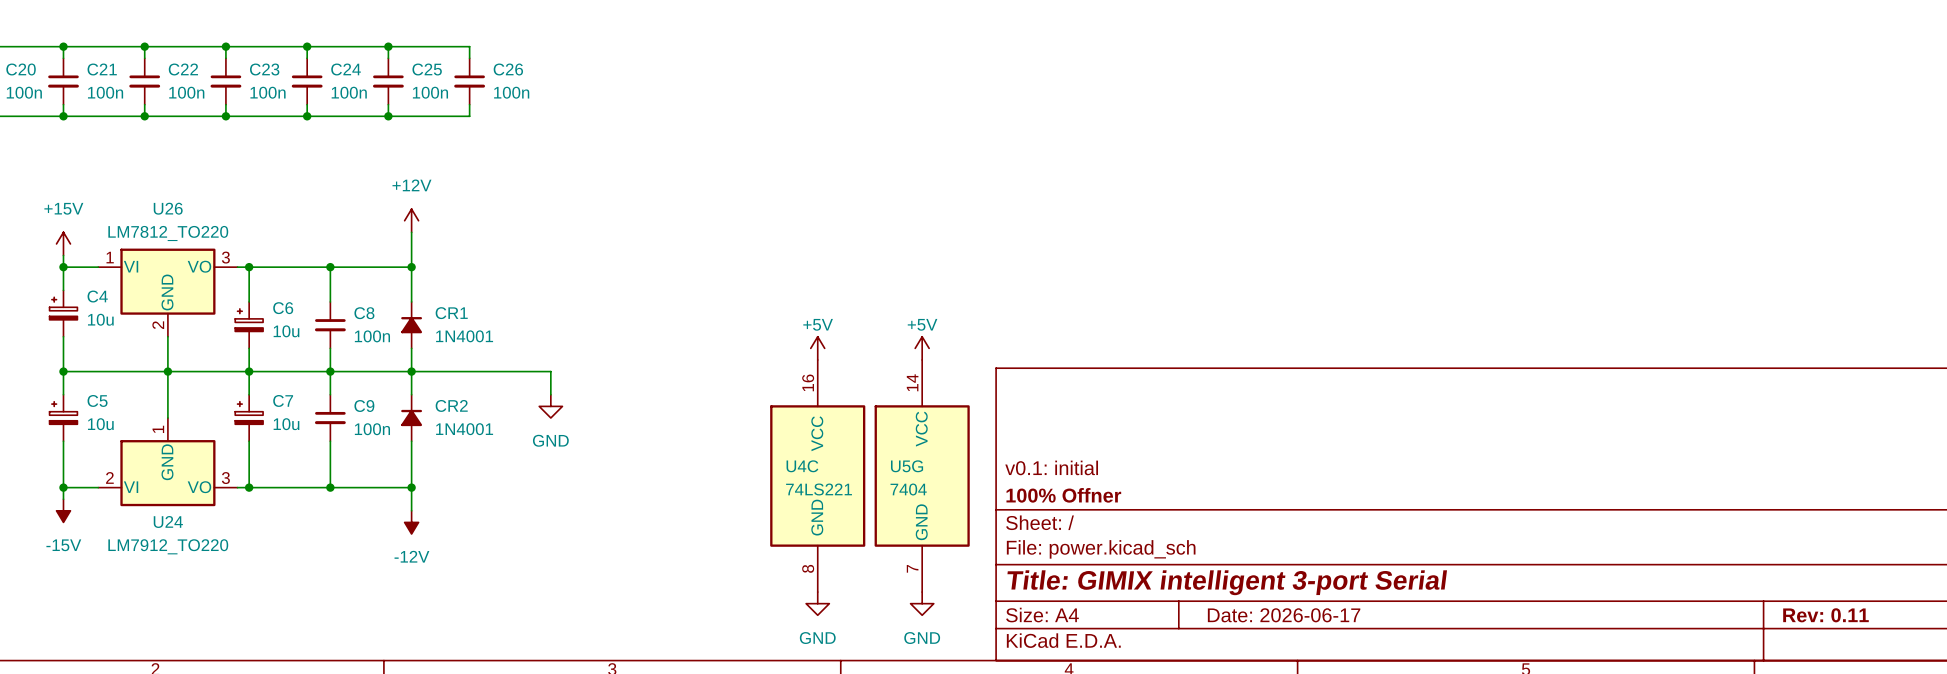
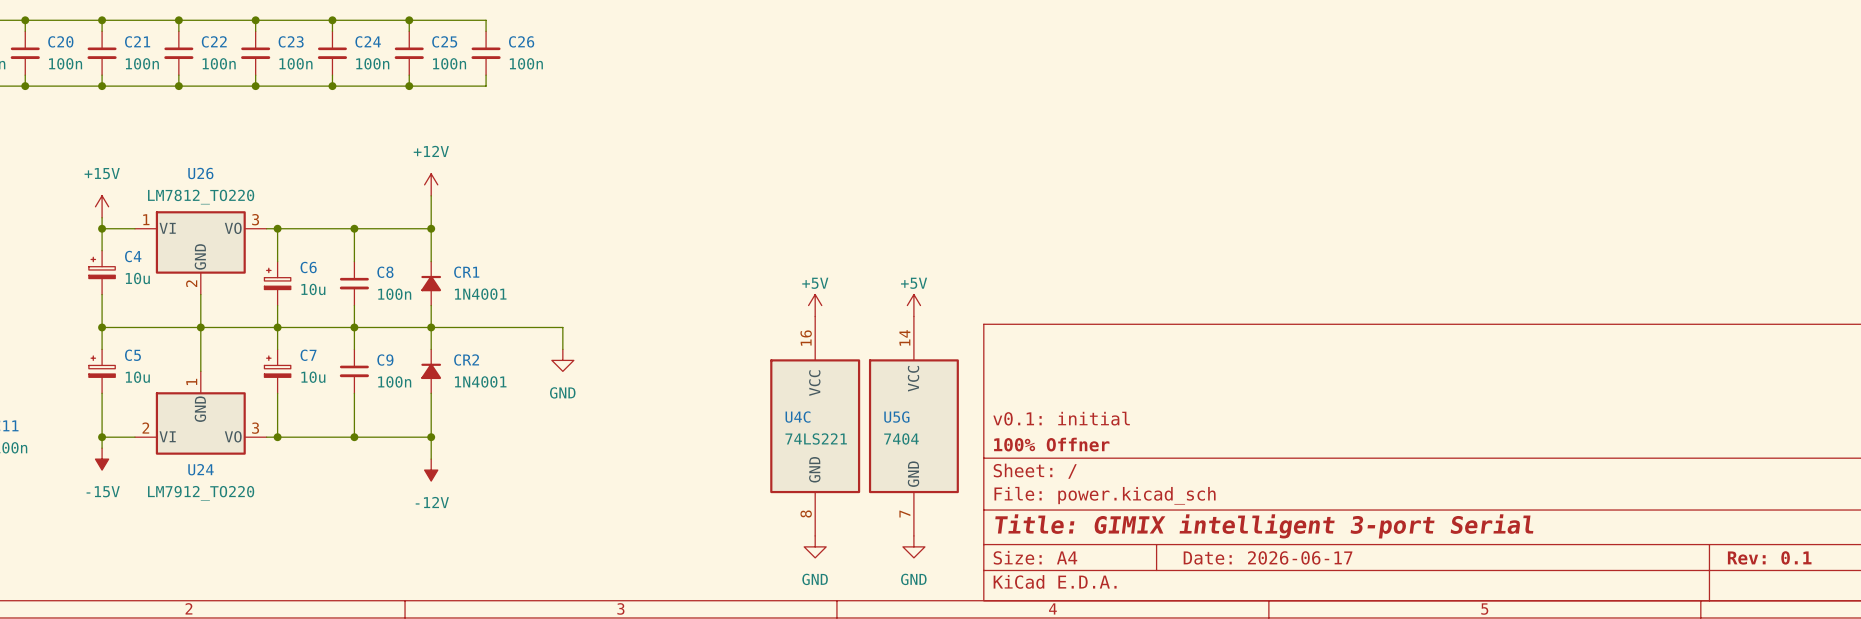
title block: Rev: 0.11 (1825, 615) -> Rev: 0.1 (1769, 557)

